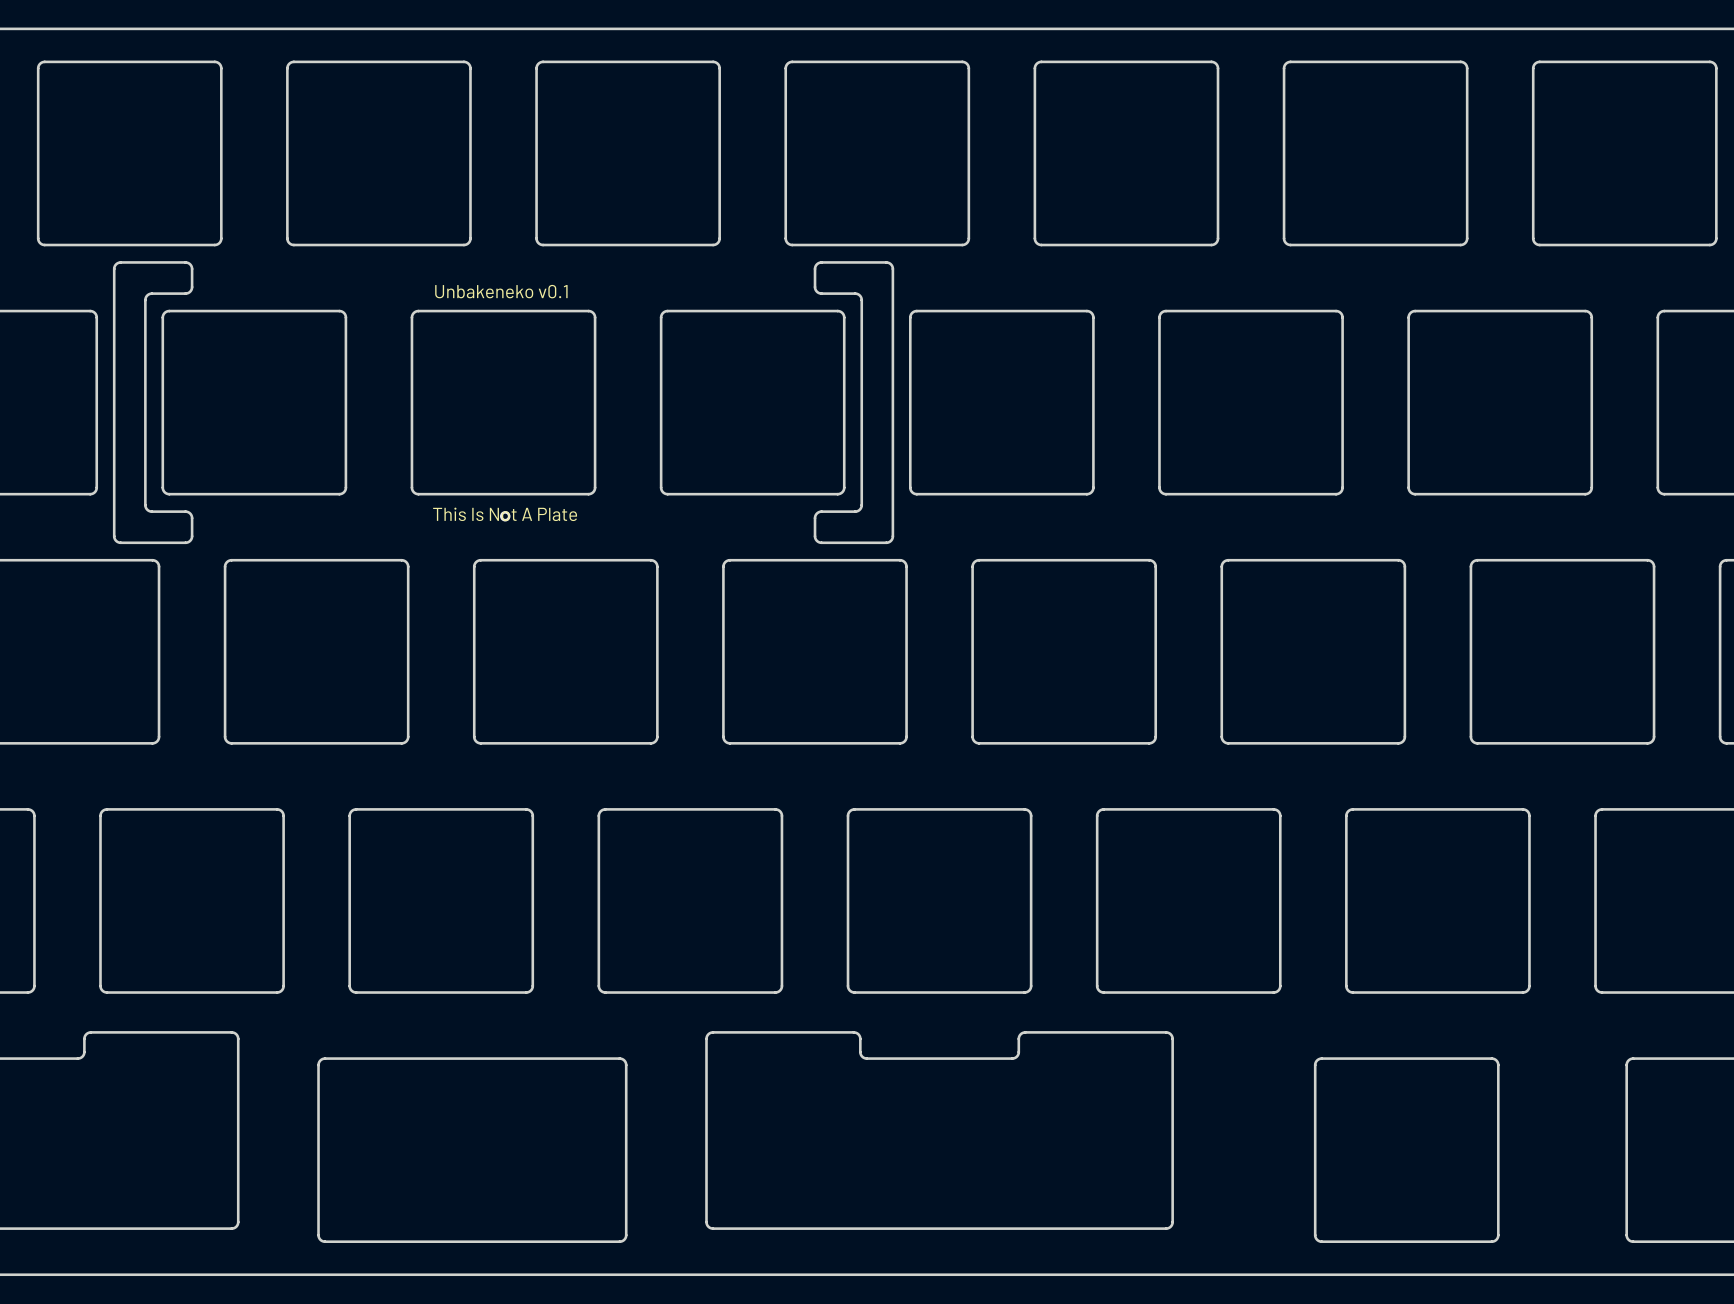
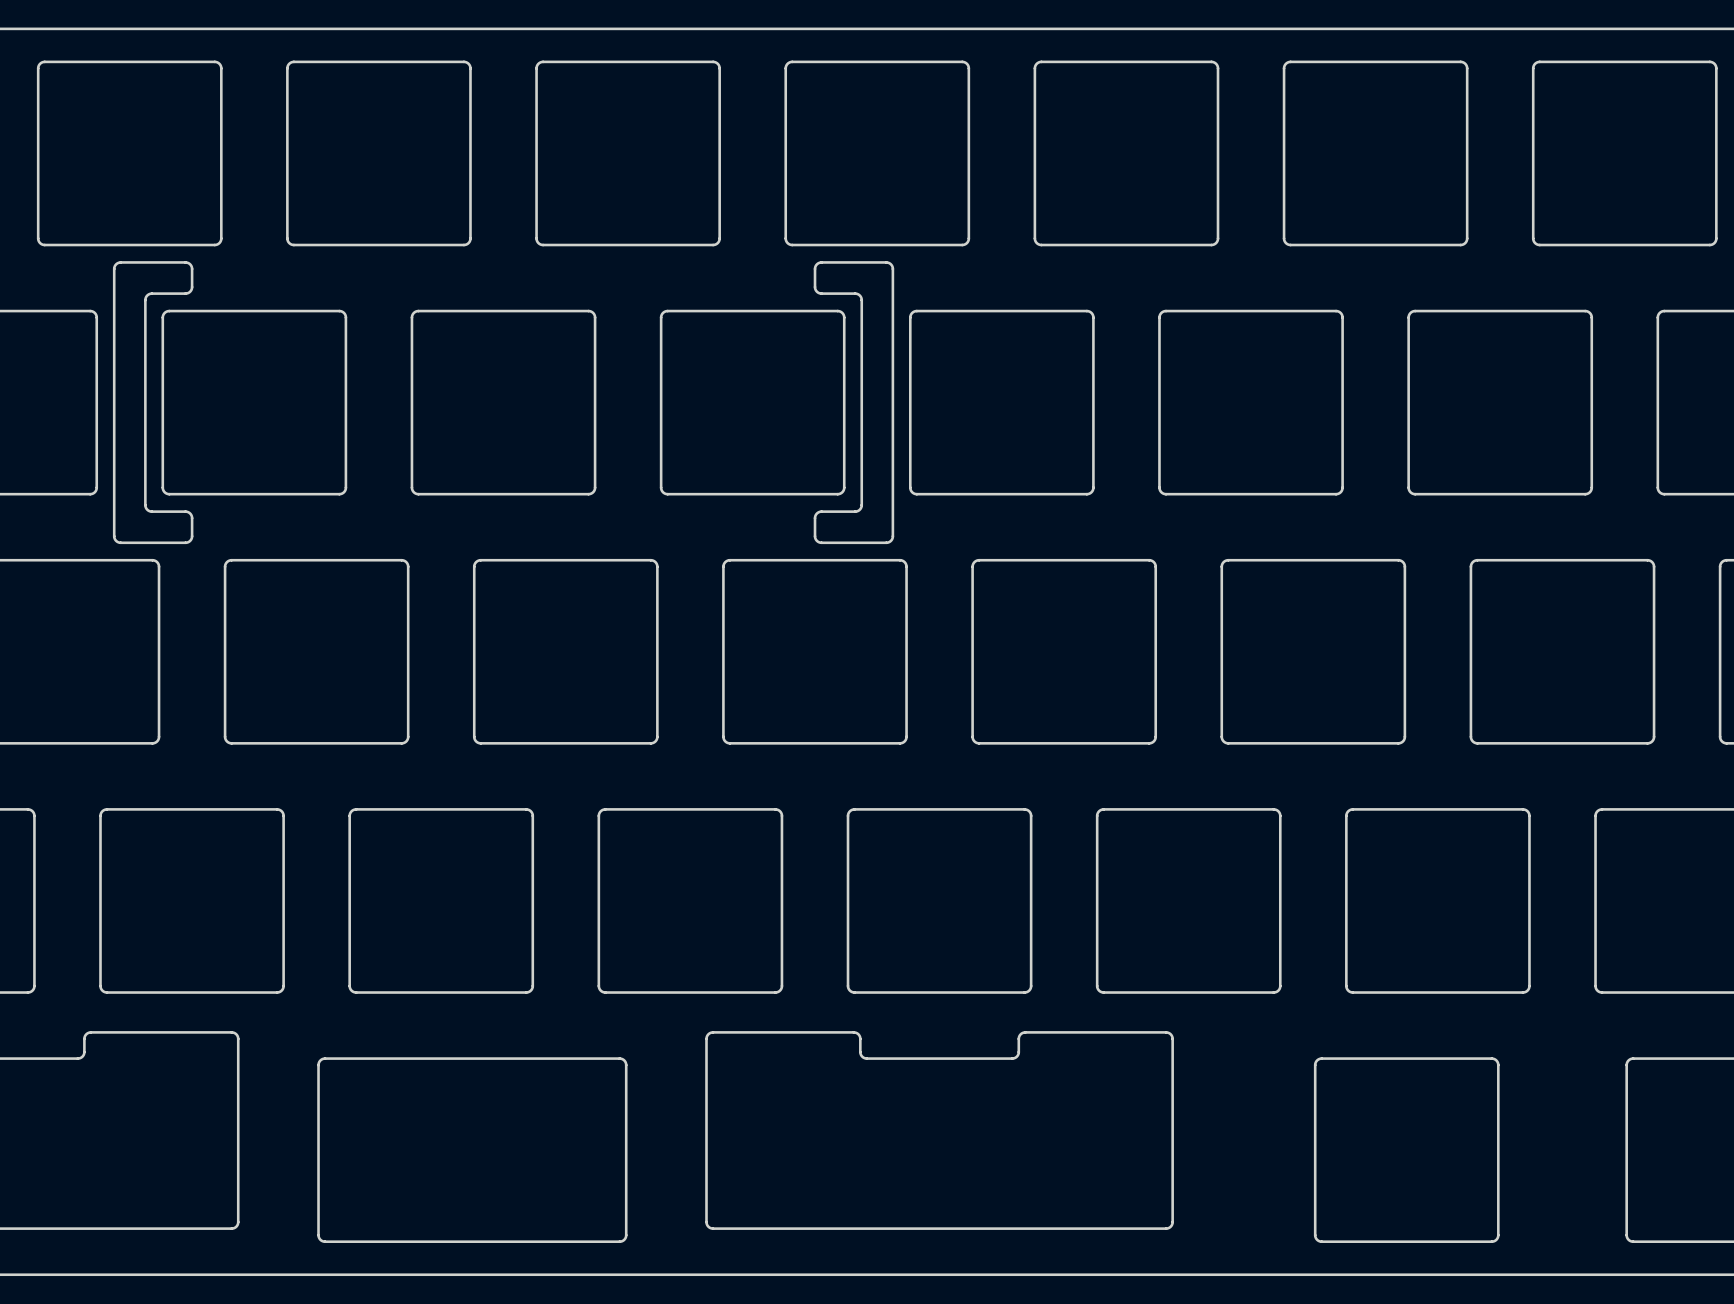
text: Unbakeneko v0.1 (501, 291) -> none
text: This Is Not A Plate (505, 514) -> none
via: (505, 516) -> none

